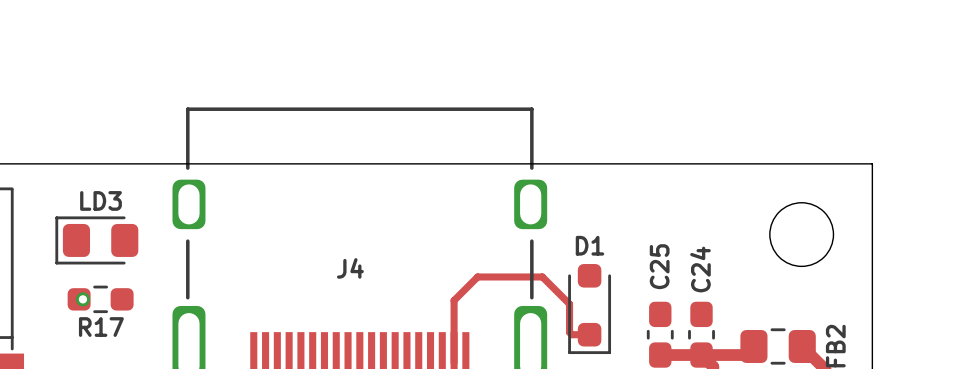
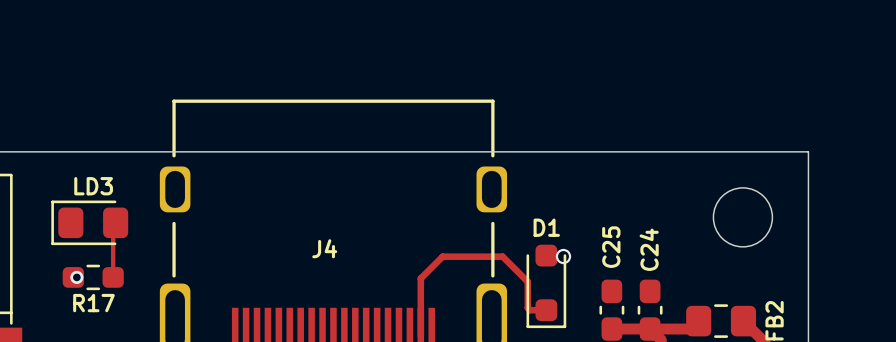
track: none -> (113, 225) (113, 277)
via: none -> (563, 256)

